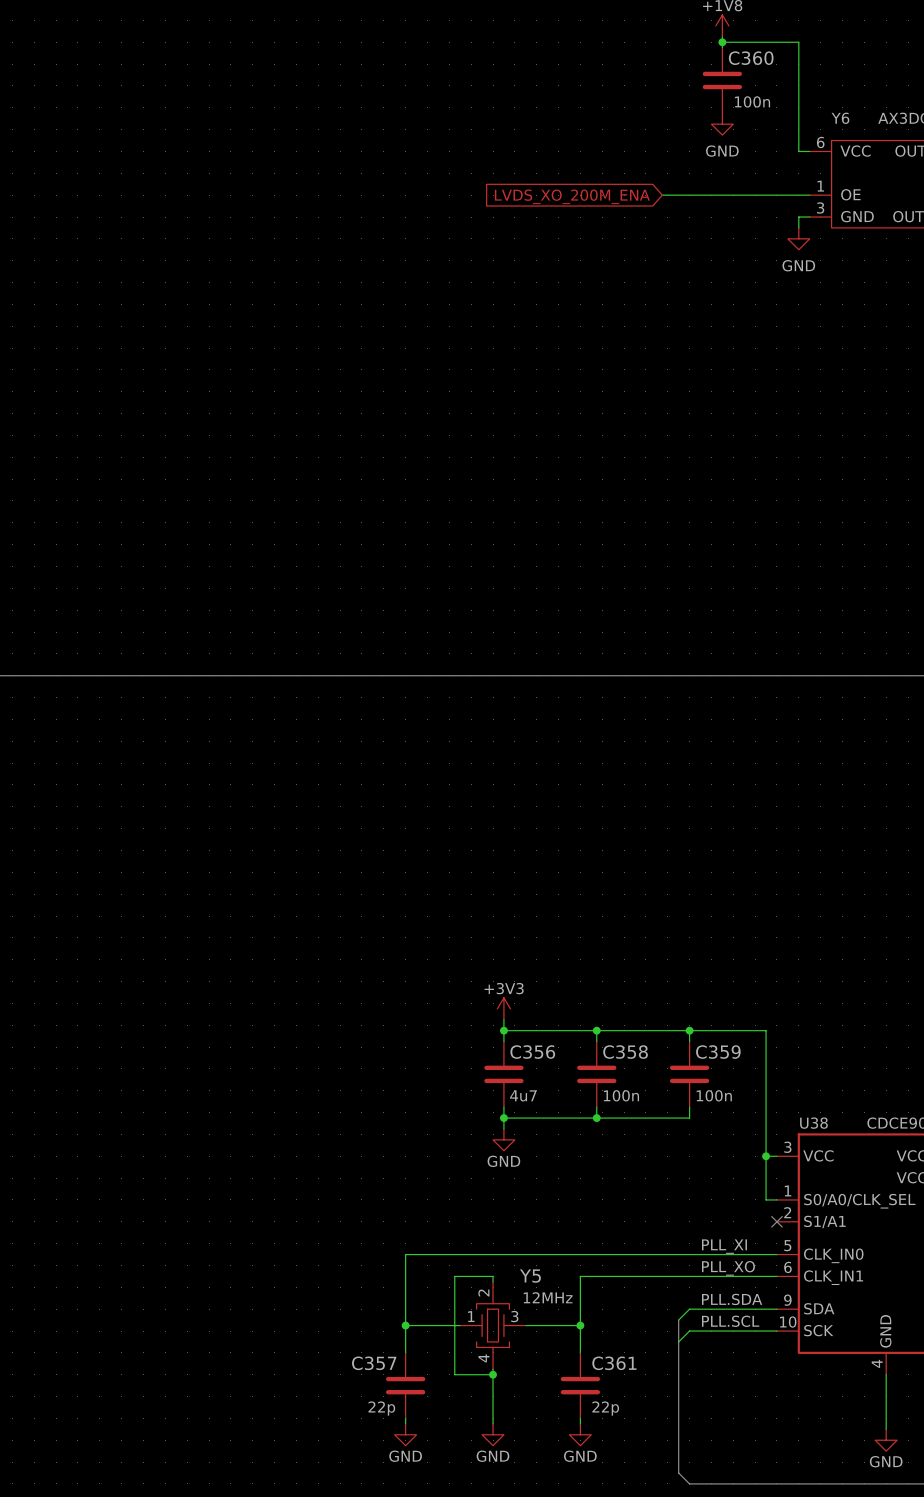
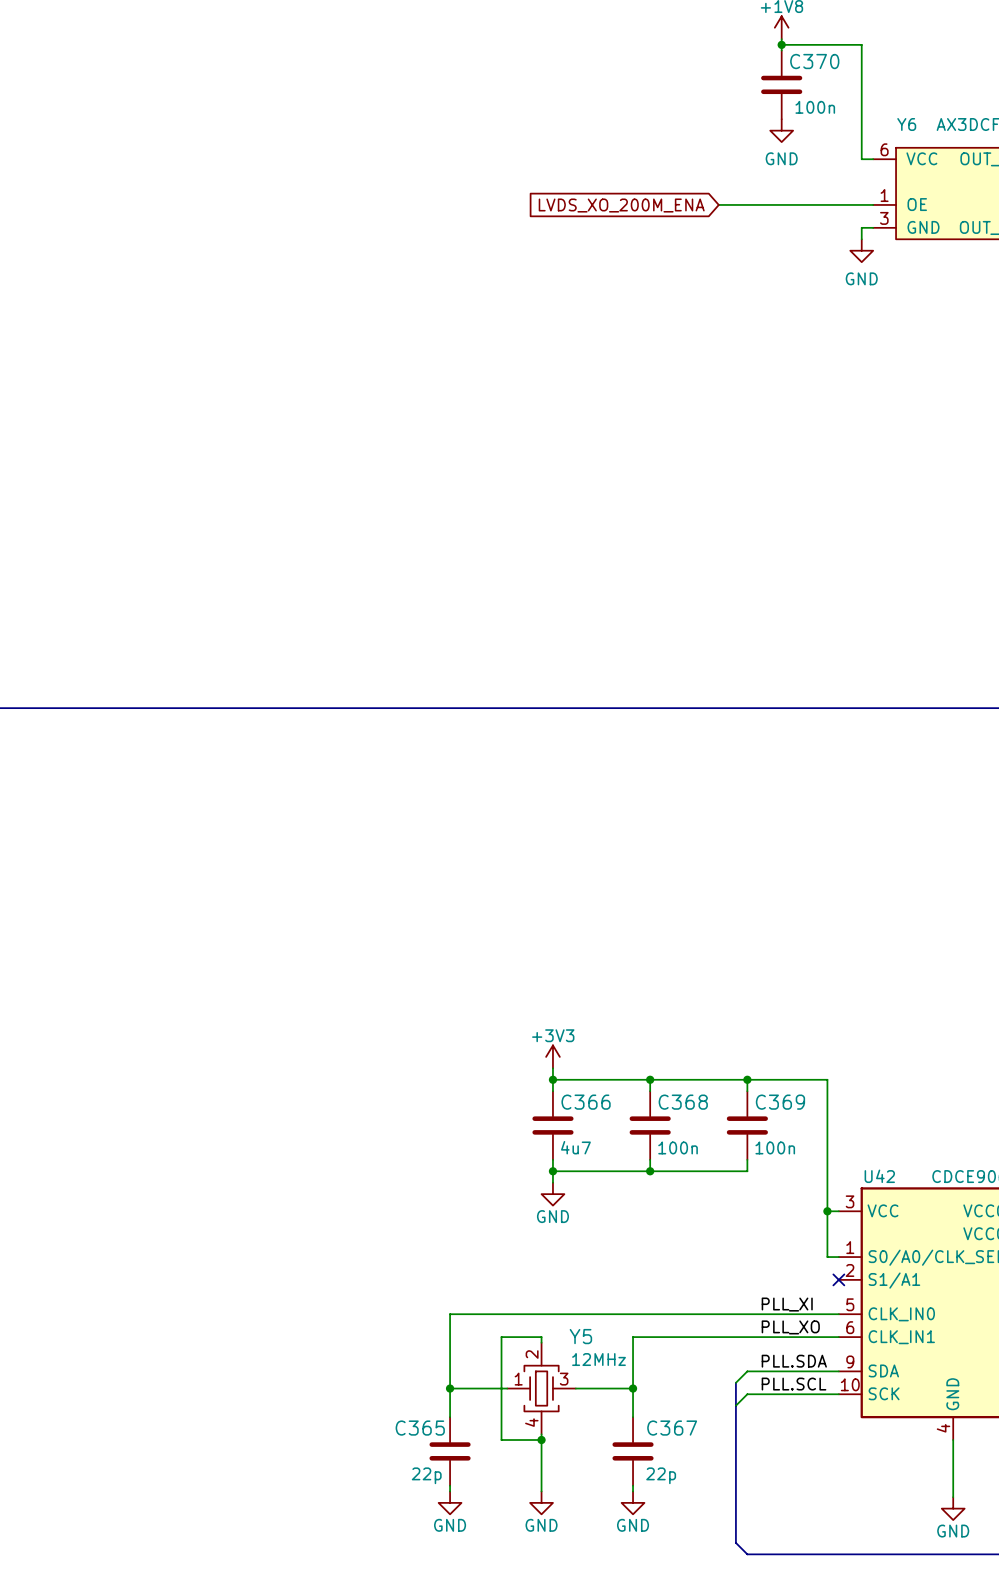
C360 name: C360 (751, 58) -> C370 (814, 61)
C356 name: C356 (532, 1052) -> C366 (586, 1102)
C358 name: C358 (625, 1052) -> C368 (683, 1102)
C359 name: C359 (718, 1052) -> C369 (780, 1102)
U38 name: U38 (813, 1123) -> U42 (879, 1176)
C357 name: C357 (374, 1363) -> C365 (420, 1428)
C361 name: C361 (614, 1363) -> C367 (672, 1428)

